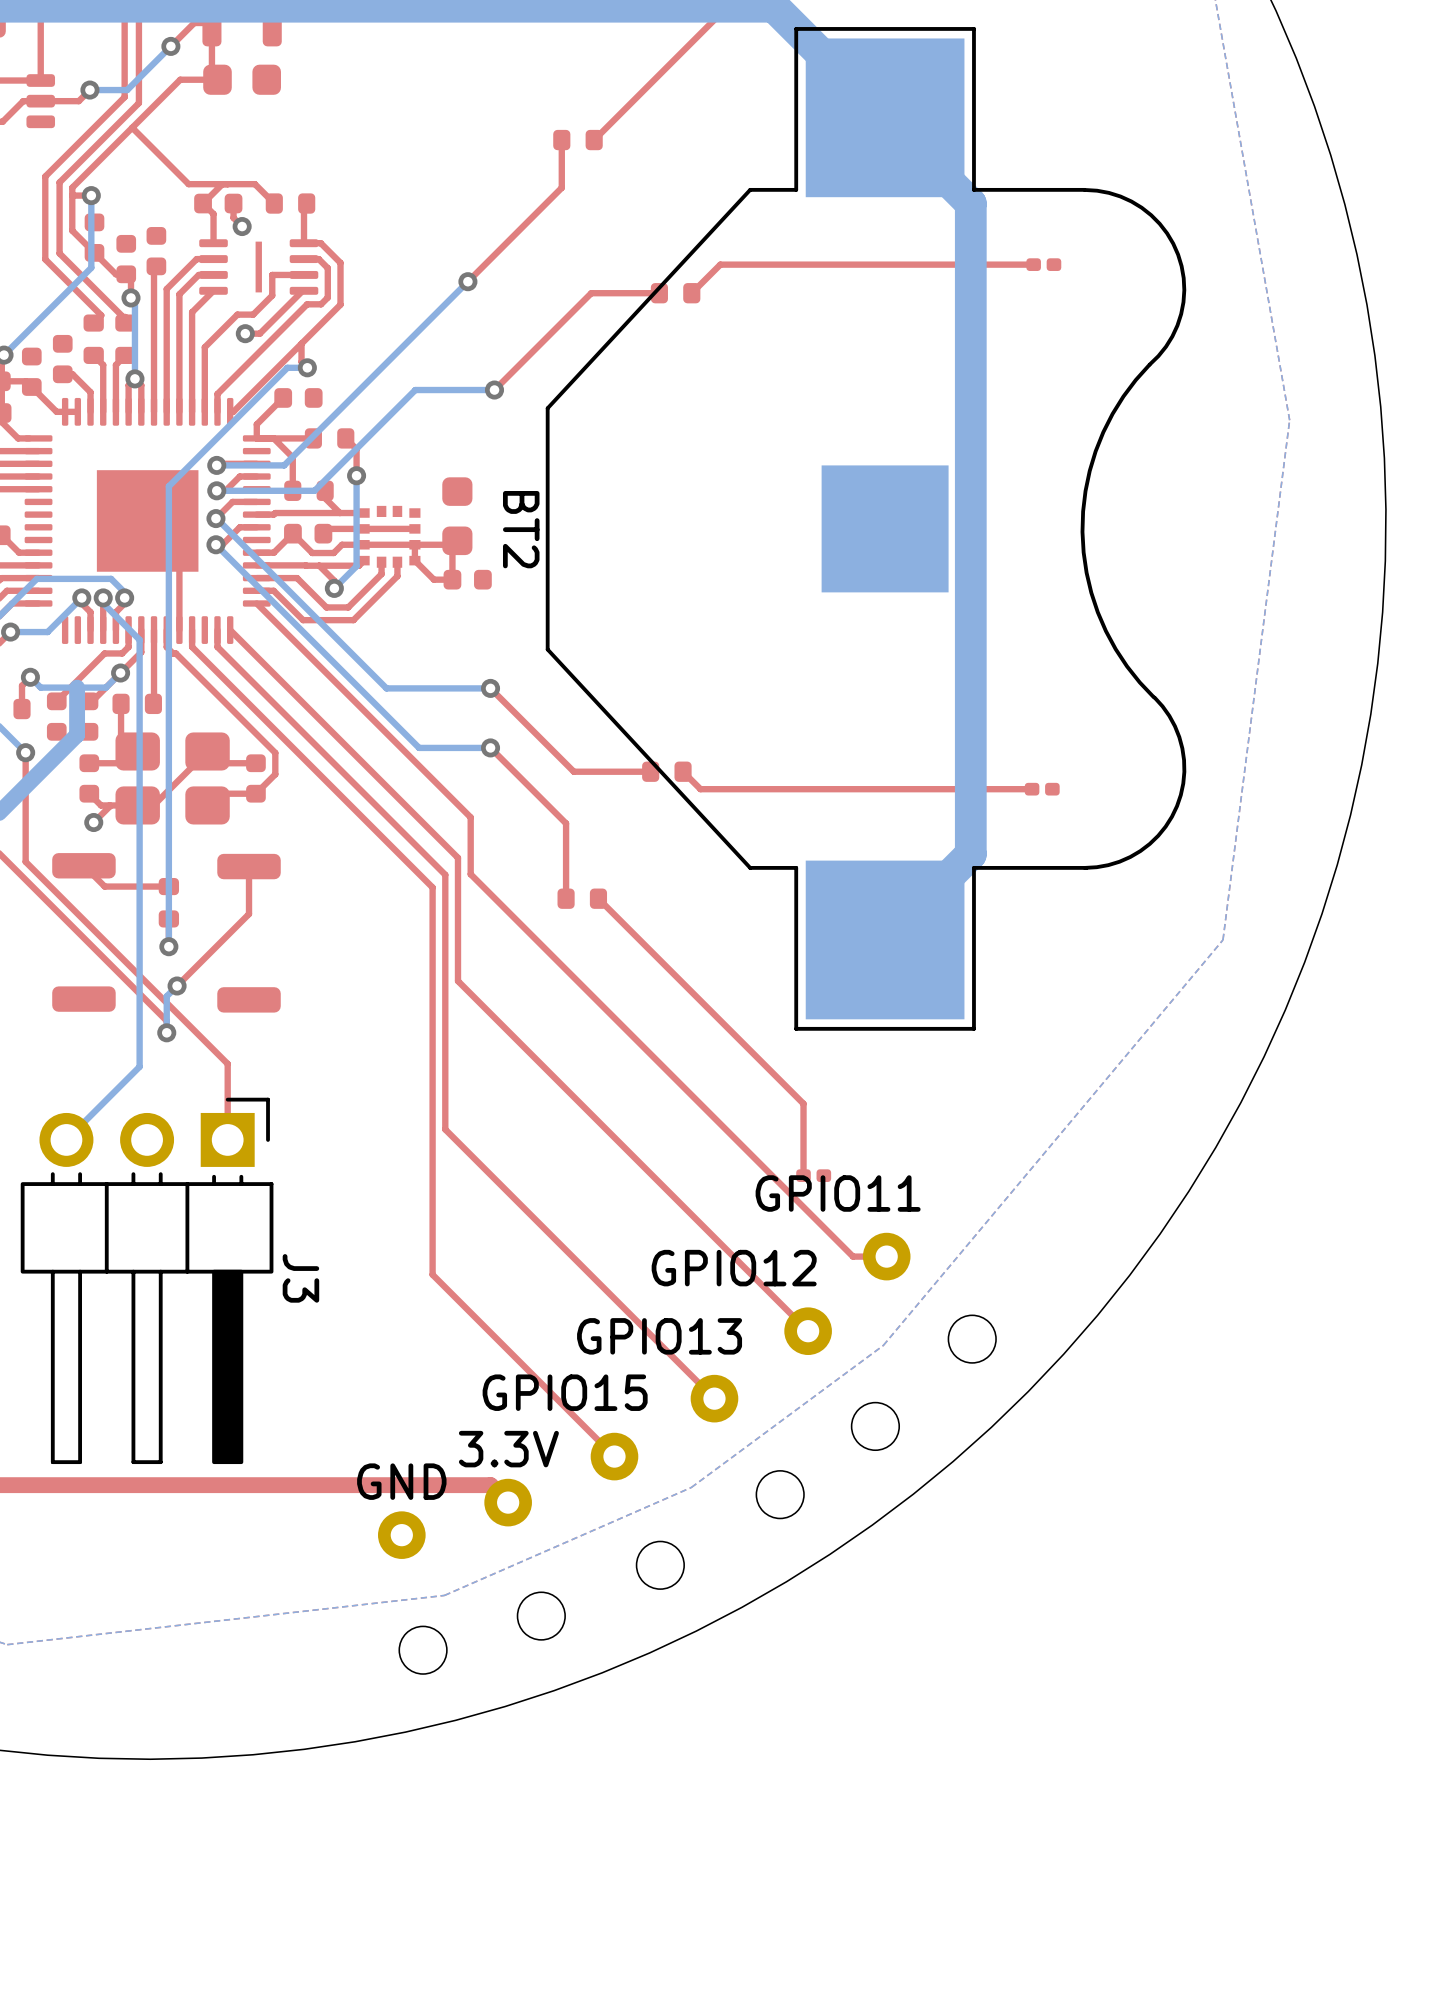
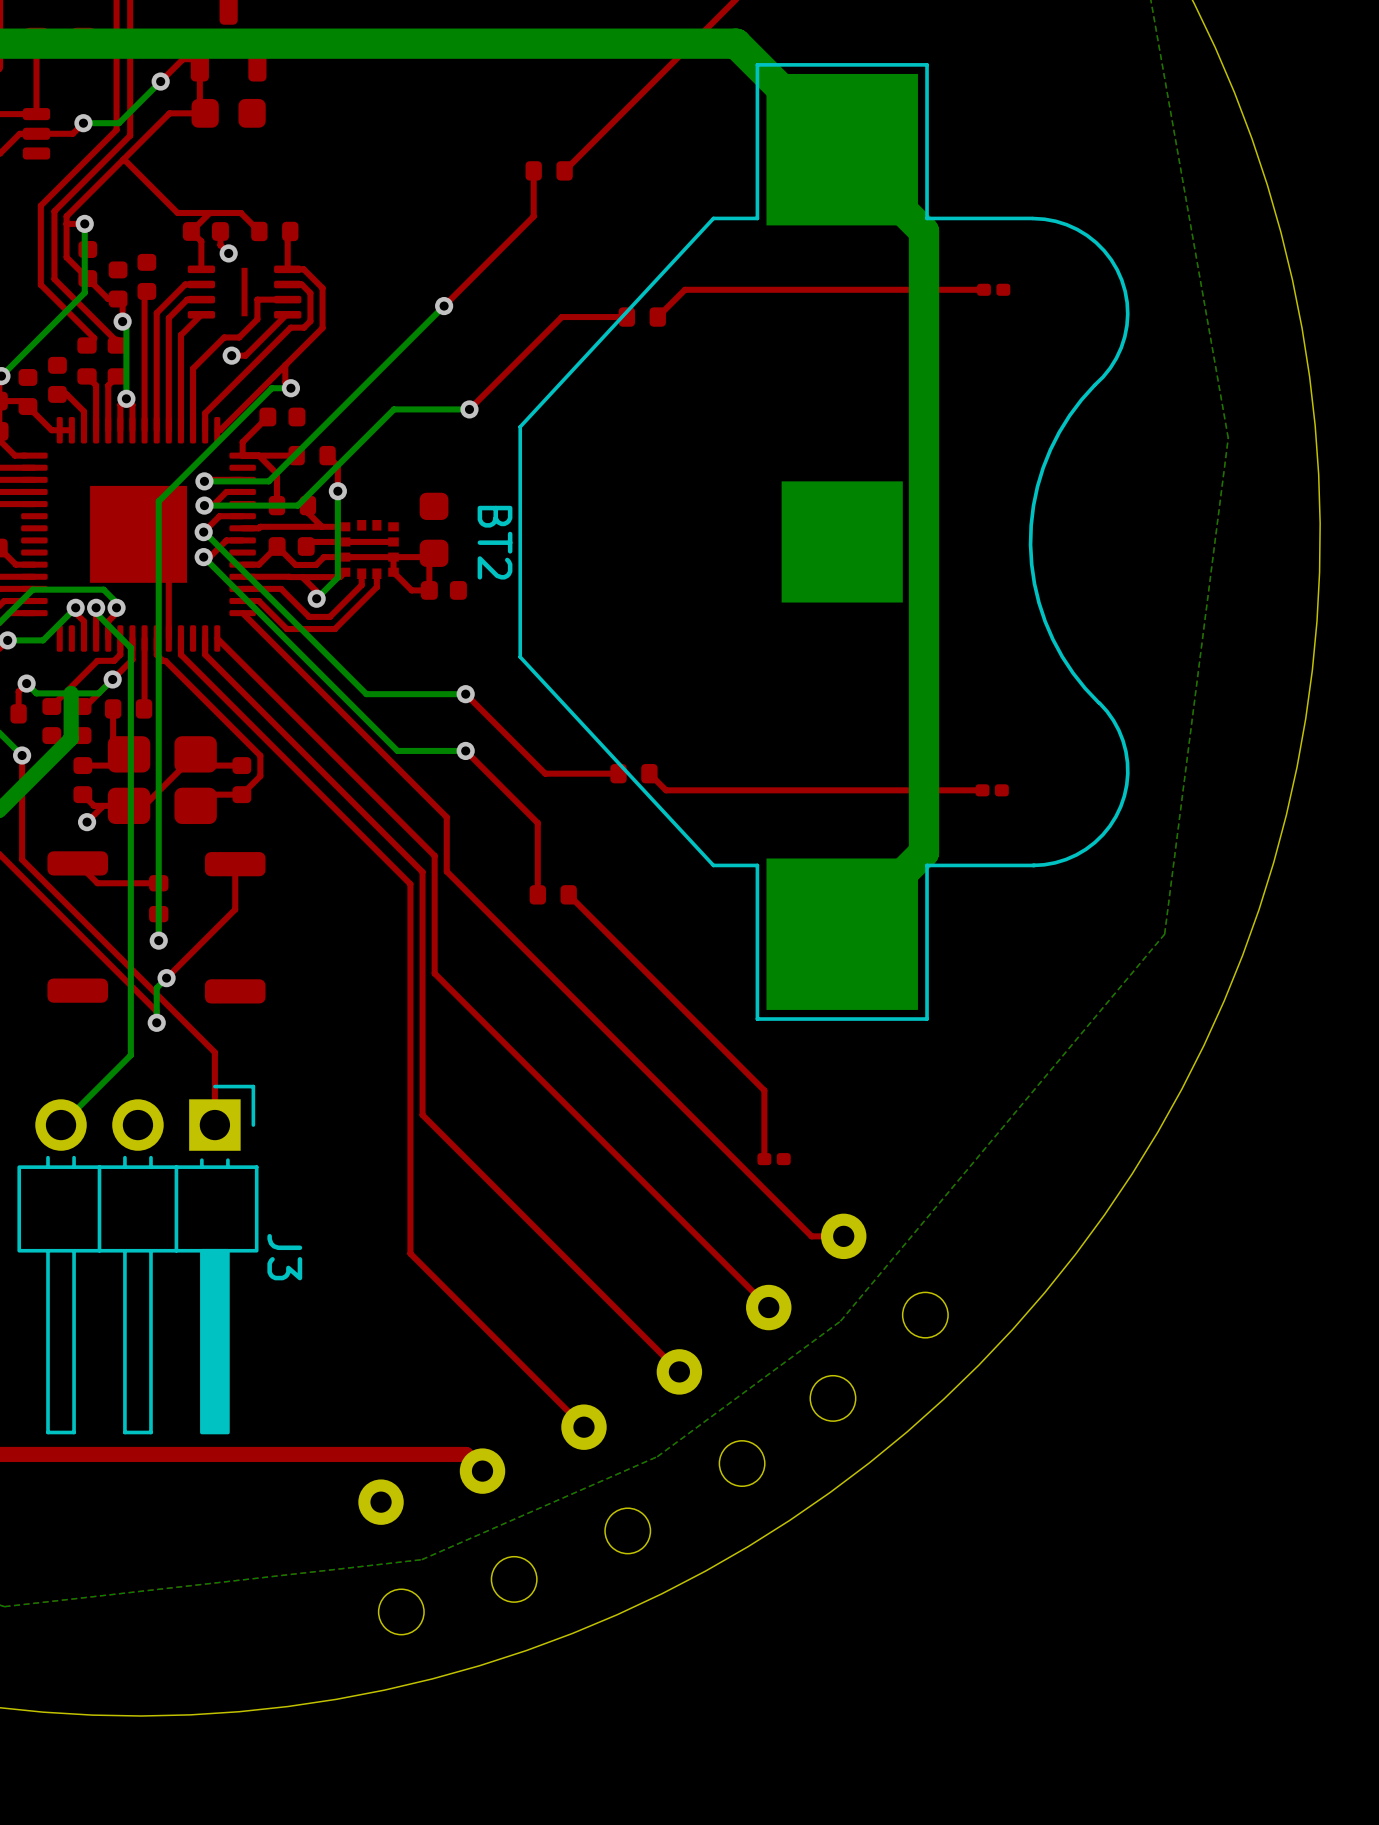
GPIO11 name: GPIO11 (838, 1193) -> none
GPIO12 name: GPIO12 (734, 1268) -> none
GPIO13 name: GPIO13 (659, 1336) -> none
GPIO15 name: GPIO15 (565, 1392) -> none
3.3V name: 3.3V (508, 1449) -> none
GND name: GND (401, 1481) -> none

